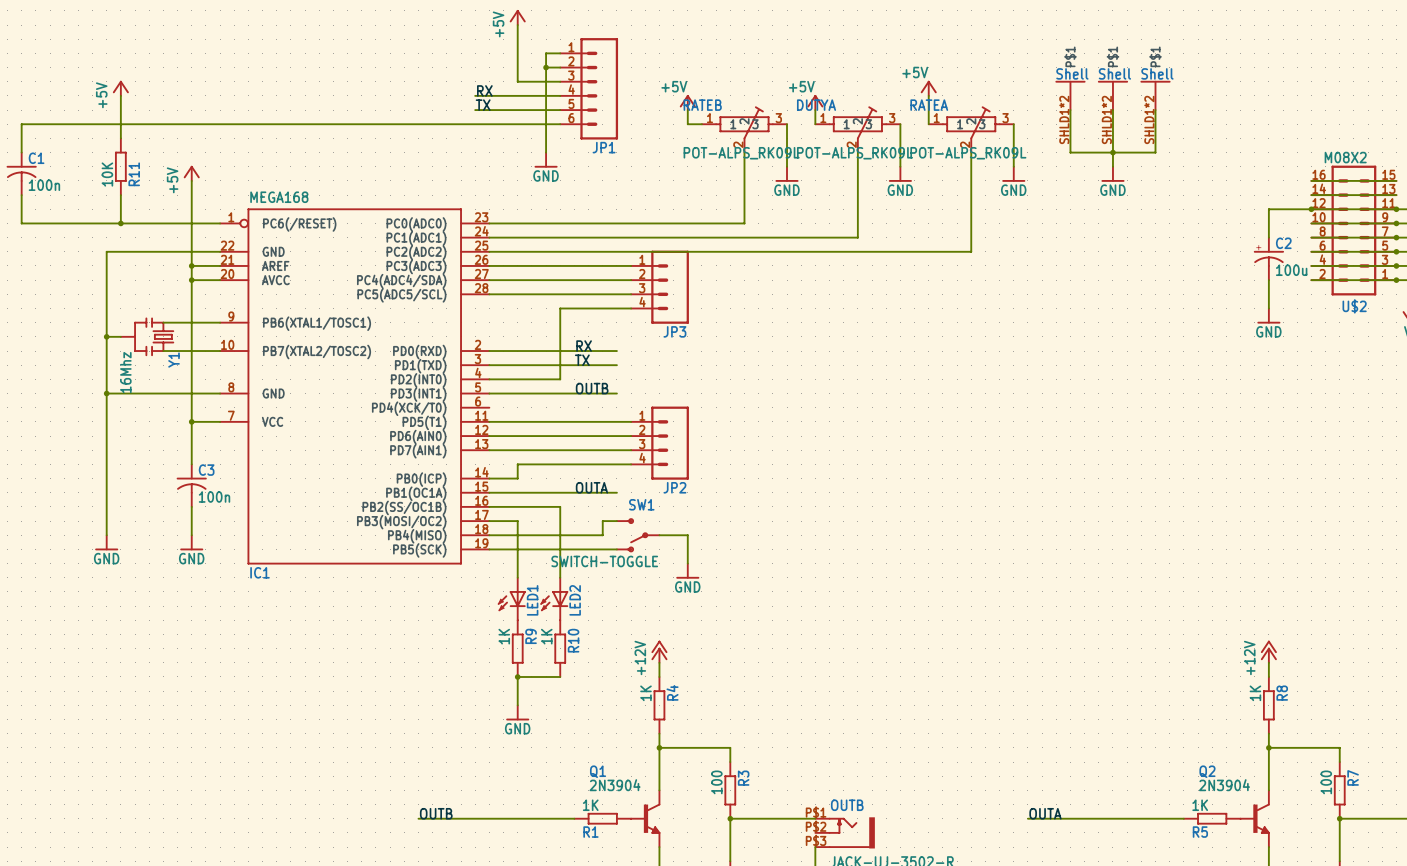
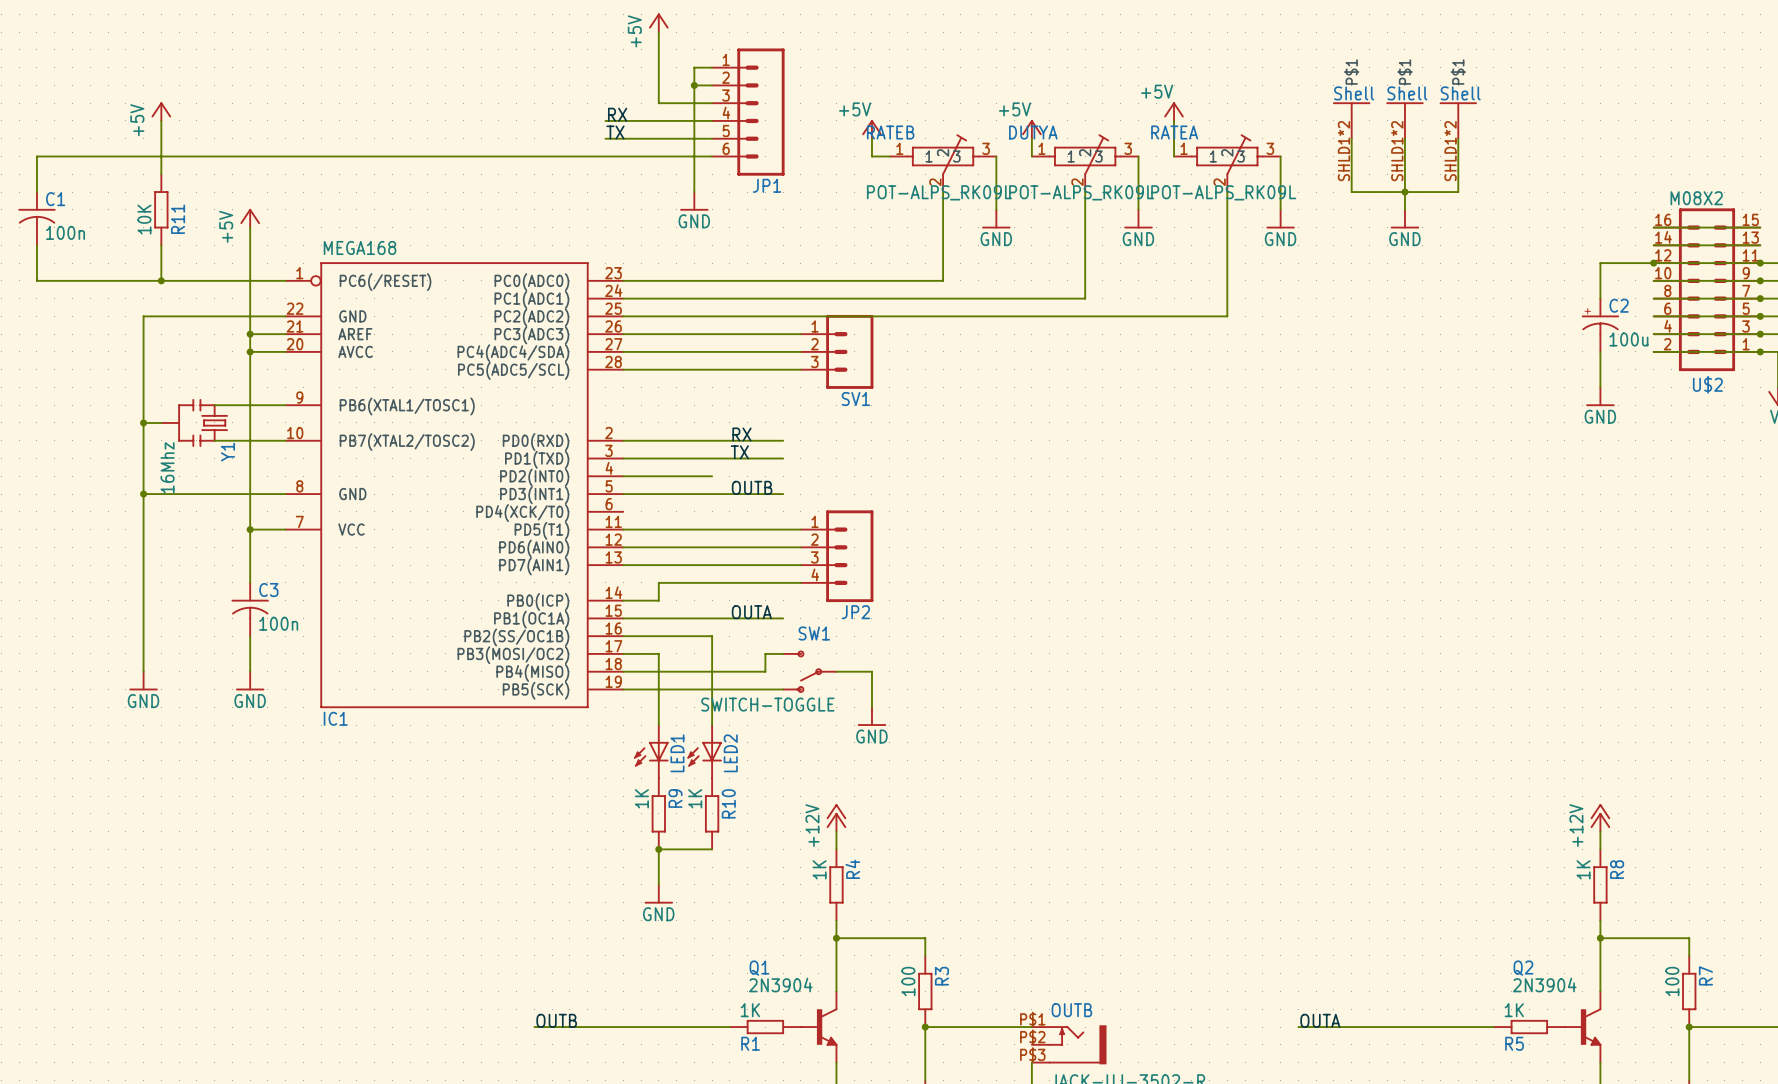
SV1: none -> (837, 351)
JP3: (660, 287) -> none
wire: (631, 308) (560, 308) (560, 379) -> none

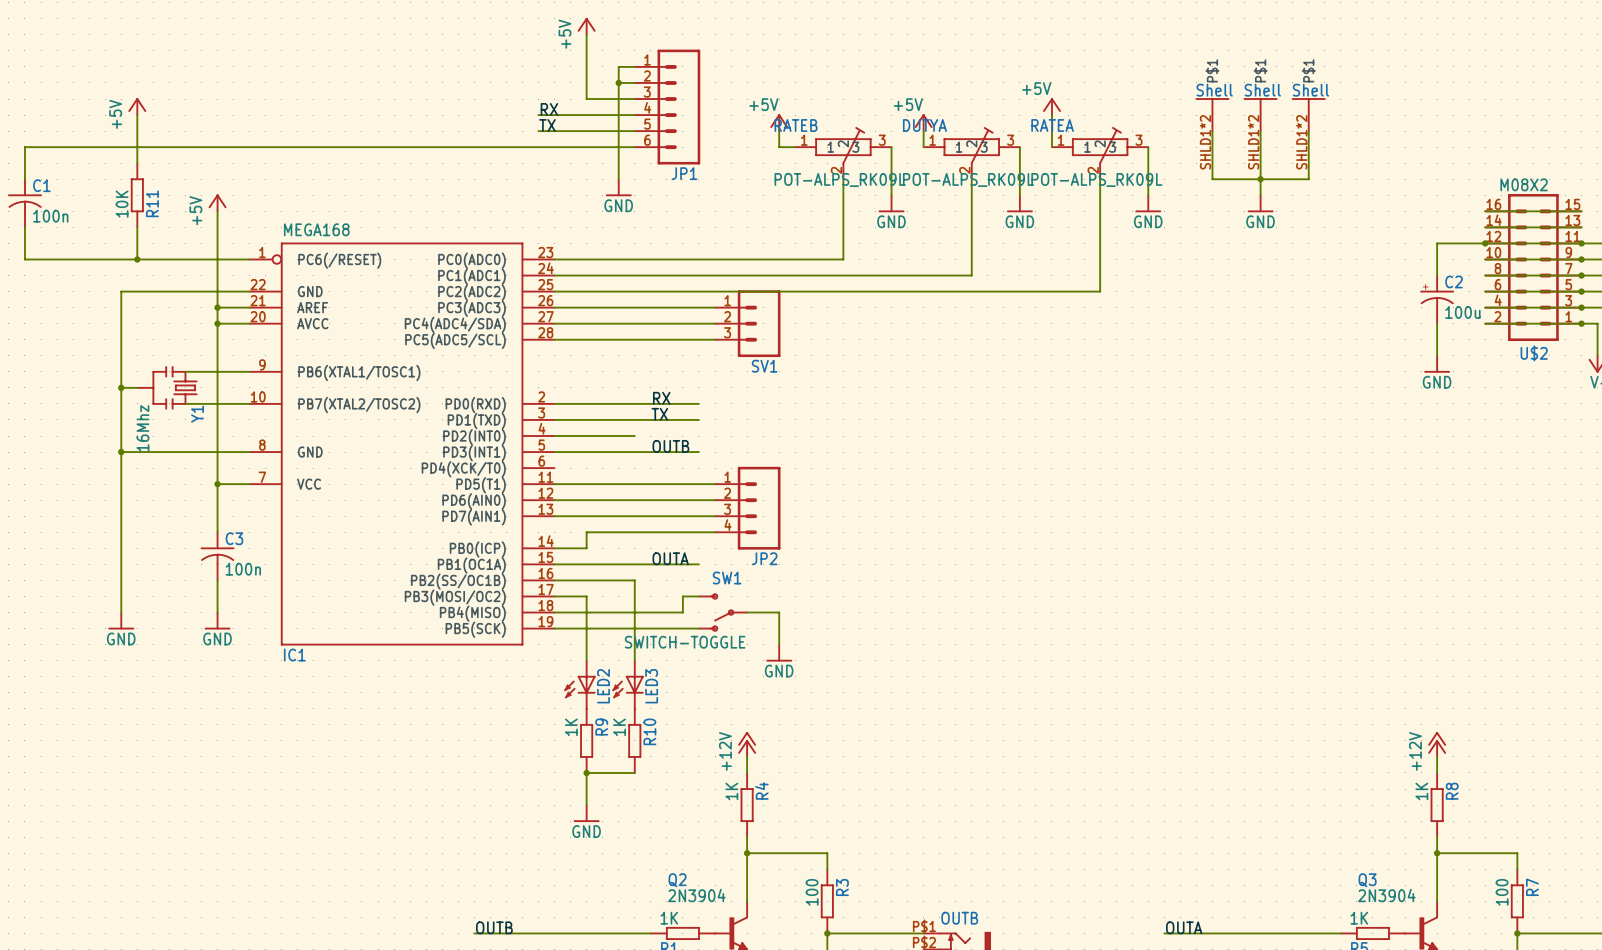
LED1 name: LED1 (677, 753) -> LED2 (603, 686)
LED2 name: LED2 (730, 753) -> LED3 (651, 686)
Q1 name: Q1 (759, 968) -> Q2 (677, 880)
Q2 name: Q2 (1523, 968) -> Q3 (1367, 880)

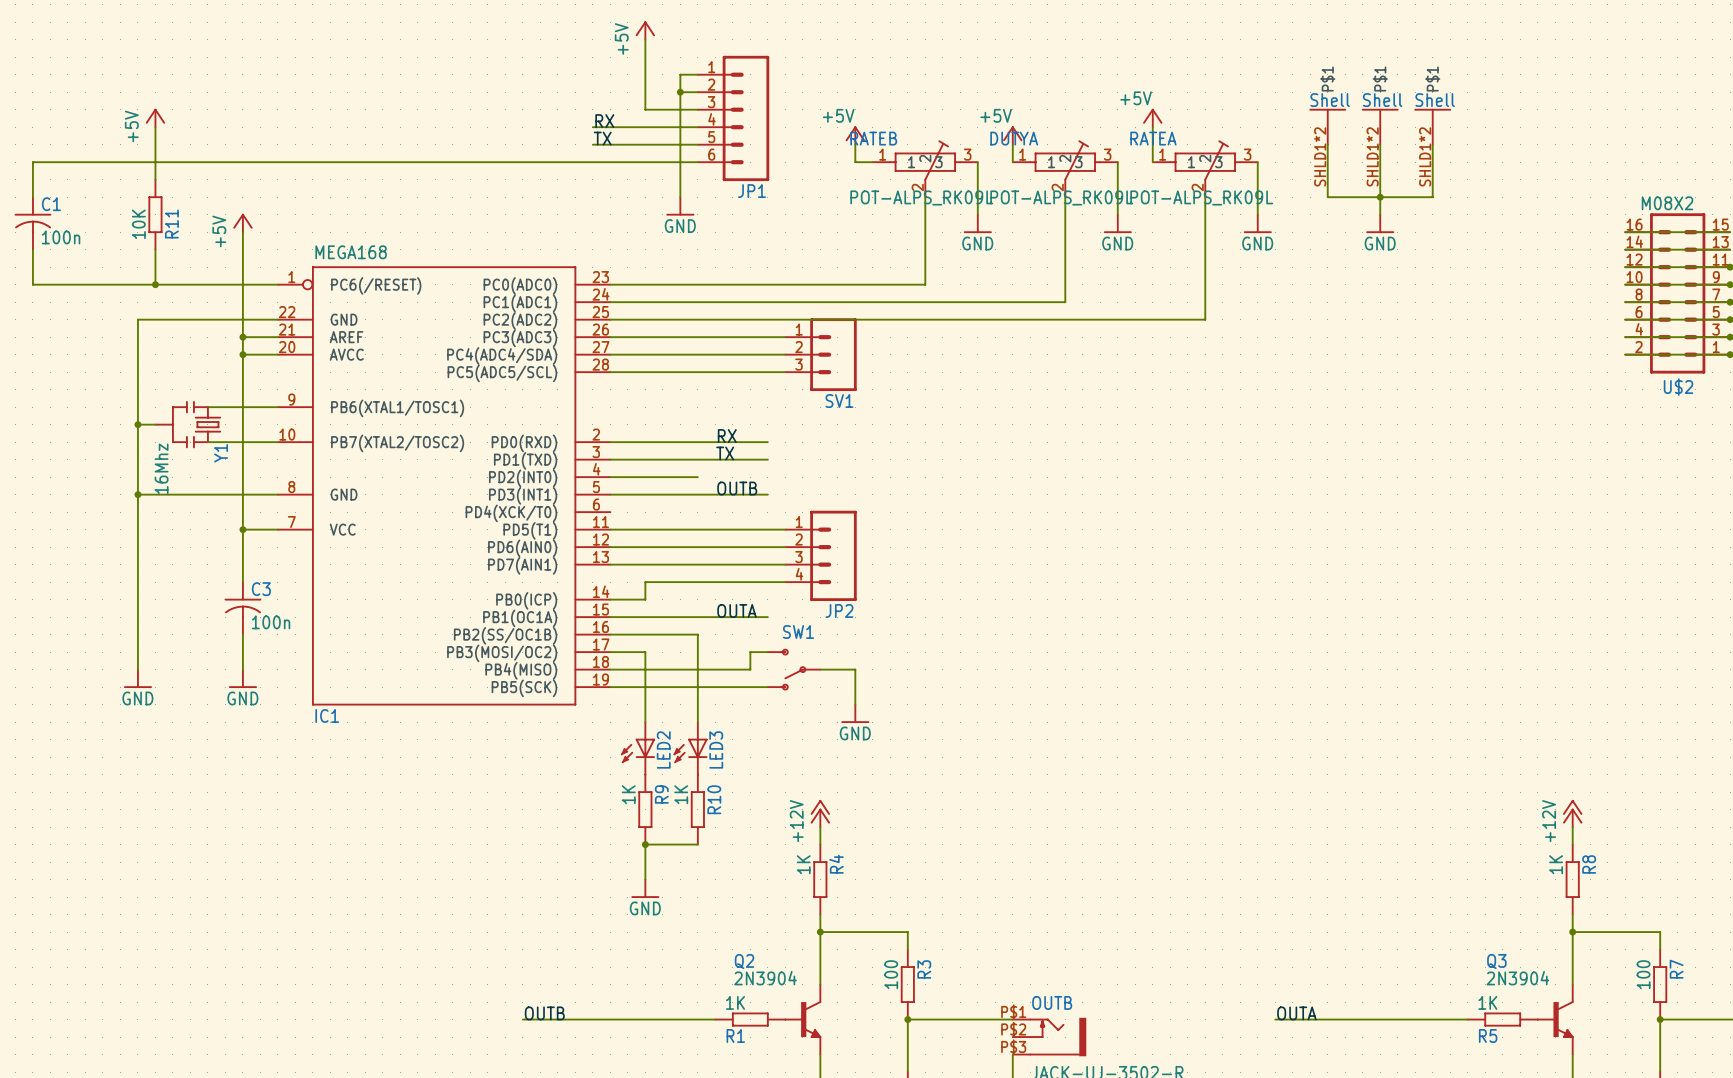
wire: (1485, 243) (1437, 243) (1437, 275) -> none
junction: (1485, 243) -> none
C2: 100u (1437, 299) -> none
wire: (1437, 323) (1437, 355) -> none
power symbol: GND (1437, 364) -> none
SW1 value: SWITCH-TOGGLE (685, 642) -> none

